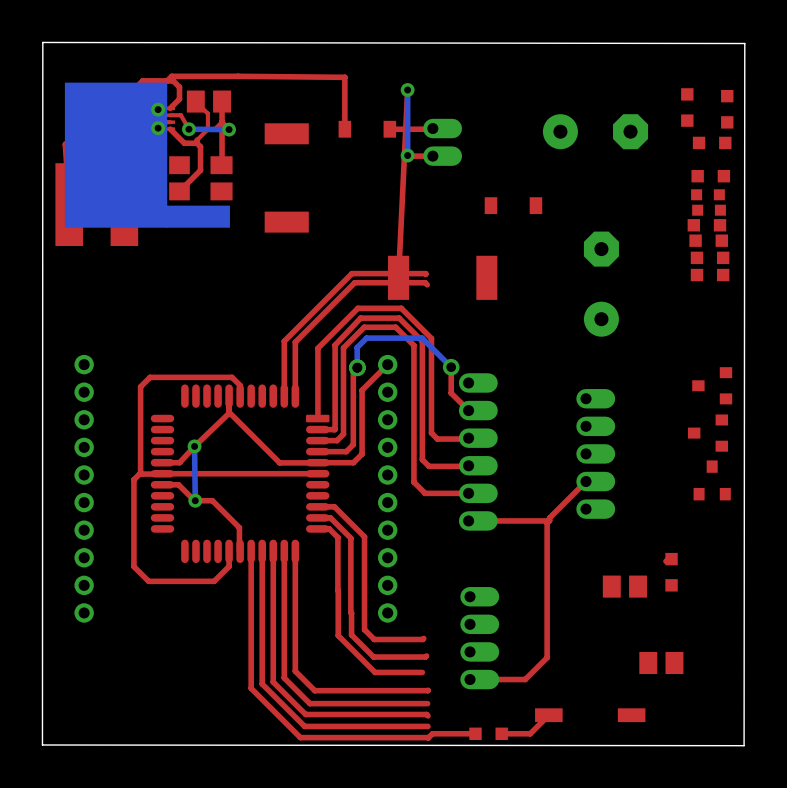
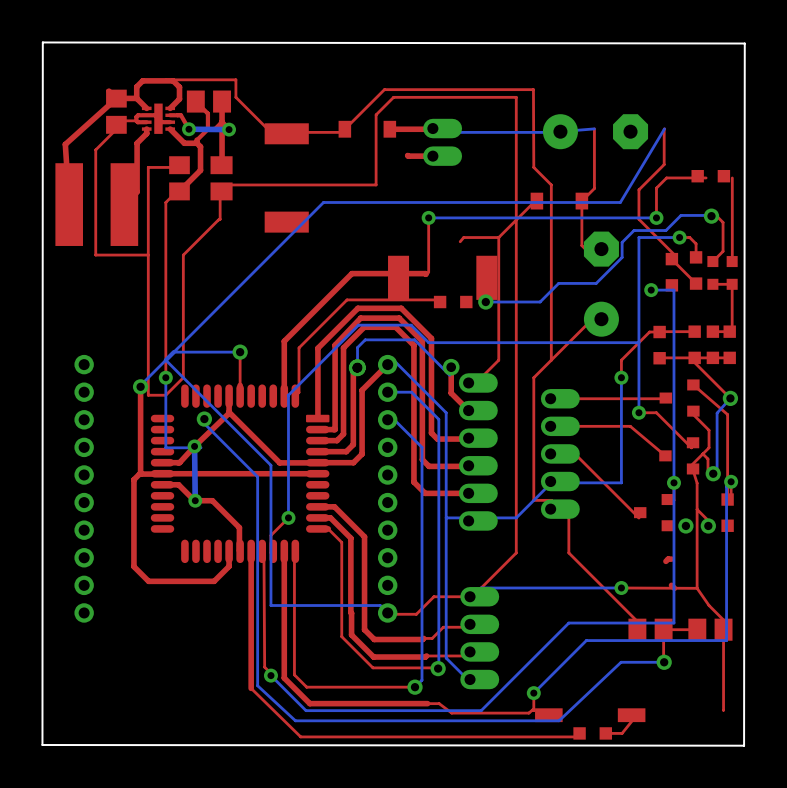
top track: none -> (165, 80) (235, 79) (235, 97) (270, 132) (287, 126) (288, 132) (341, 132) (384, 89) (533, 89) (533, 167) (551, 184) (551, 360)
top track: (167, 80) (171, 76) (344, 77) (344, 133) -> none
drawing: [64, 82, 230, 228] -> none
top track: (407, 89) (398, 277) -> none
bottom track: (407, 89) (407, 155) -> none
via: (407, 89) -> none
part: (687, 107) -> none
via: (158, 109) -> none
part: (727, 109) -> none
top track: none -> (136, 120) (120, 120) (113, 132) (95, 149) (95, 255) (148, 255)
via: (158, 128) -> none
bottom track: none -> (432, 128) (446, 132) (551, 132) (594, 128)
top track: none -> (594, 128) (594, 188) (581, 201) (581, 245) (587, 250)
top track: none -> (664, 128) (664, 164) (638, 189) (638, 219) (673, 254) (671, 259) (696, 283)
bottom track: none -> (664, 128) (620, 202) (323, 202) (140, 386)
part: (712, 142) -> none
via: (407, 155) -> none
top track: none -> (179, 165) (183, 167) (148, 167) (148, 395) (165, 395) (183, 377) (183, 255) (220, 219) (221, 191) (218, 184) (376, 184) (376, 114) (393, 97) (516, 97) (516, 552) (470, 596) (433, 596) (416, 614) (387, 612)
top track: none -> (706, 177) (666, 177) (656, 188) (656, 217)
top track: none -> (732, 177) (732, 261)
top track: none -> (183, 184) (165, 202) (165, 377)
part: (707, 194) -> none
top track: none -> (536, 201) (498, 237)
part position: (513, 205) -> (559, 201)
part: (709, 210) -> none
top track: none -> (711, 216) (716, 216) (723, 222) (723, 251) (712, 261)
bottom track: none -> (711, 216) (681, 215) (665, 230) (634, 230) (622, 242) (622, 257) (596, 283) (558, 283) (540, 302) (485, 302)
via: none -> (711, 216)
top track: none -> (428, 217) (428, 272)
via: none -> (428, 217)
bottom track: none -> (656, 217) (428, 217)
via: none -> (656, 217)
part: (706, 225) -> none
top track: none -> (498, 237) (463, 237) (460, 241)
top track: none -> (498, 237) (498, 360) (481, 377) (468, 382)
top track: none -> (679, 237) (689, 237) (696, 243) (696, 257) (691, 255)
bottom track: none -> (679, 237) (638, 237) (638, 412)
via: none -> (679, 237)
part: (708, 240) -> none
part: (710, 257) -> none
part footprint: [690, 268, 730, 282] -> [707, 256, 719, 290]
part: none -> (696, 270)
part: none -> (671, 272)
part: none -> (732, 272)
top track: (427, 284) (425, 282) (354, 282) (295, 342) (295, 396) -> (440, 302) (437, 299) (347, 299) (299, 347) (299, 392) (295, 396)
top track: none -> (712, 284) (732, 284) (732, 329) (729, 331) (712, 331)
bottom track: none -> (651, 290) (673, 290) (673, 623) (568, 623) (481, 710) (306, 710) (270, 675)
via: none -> (651, 290)
part: none -> (453, 302)
via: none -> (485, 302)
top track: none -> (587, 320) (586, 325) (533, 377) (533, 500) (551, 500)
top track: none -> (694, 331) (649, 332) (621, 360) (621, 377)
bottom track: none -> (638, 342) (428, 342) (411, 325) (358, 325) (288, 395) (288, 517)
part: none -> (694, 344)
part: none -> (712, 344)
part: none -> (729, 344)
part: none -> (659, 345)
bottom track: none -> (240, 352) (173, 352) (165, 360) (270, 465) (270, 605) (380, 605) (387, 612)
via: none -> (240, 352)
top track: none -> (694, 357) (694, 362) (730, 398)
top track: none -> (729, 357) (659, 358)
bottom track: none -> (387, 364) (393, 360) (446, 412) (446, 658) (470, 679)
bottom track: (451, 367) (422, 338) (366, 338) (357, 347) (357, 367) -> none
bottom track: none -> (357, 369) (357, 347) (365, 339) (414, 339) (449, 375)
bottom track: none -> (165, 377) (165, 447) (200, 447) (194, 446) (194, 500) (194, 501)
via: none -> (165, 377)
bottom track: none -> (621, 377) (621, 482) (551, 482)
via: none -> (621, 377)
top track: none -> (693, 384) (727, 414) (727, 499) (731, 500) (731, 481)
top track: (240, 385) (232, 377) (150, 377) (140, 386) -> (240, 385) (240, 352)
part: (712, 385) -> none
via: none -> (140, 386)
bottom track: none -> (387, 392) (411, 392) (438, 419) (438, 668)
top track: none -> (665, 398) (550, 398)
part: none -> (679, 398)
bottom track: none -> (730, 398) (717, 413) (717, 469) (713, 473)
via: none -> (730, 398)
top track: none -> (693, 411) (691, 412) (709, 430) (709, 447) (691, 465)
top track: none -> (638, 412) (656, 412) (691, 447) (693, 442)
via: none -> (638, 412)
bottom track: none -> (204, 419) (202, 419) (202, 422) (257, 476) (257, 685) (295, 720) (559, 720) (621, 662) (664, 662)
via: none -> (204, 419)
bottom track: none -> (387, 419) (394, 419) (422, 447) (422, 680) (415, 687)
top track: none -> (550, 426) (630, 426) (665, 455)
part: (707, 433) -> none
top track: none -> (550, 453) (551, 447) (568, 447) (638, 517) (640, 512)
part position: (595, 453) -> (560, 453)
top track: none -> (702, 453) (707, 459) (707, 473) (713, 473)
part: none -> (679, 455)
top track: none -> (691, 465) (697, 483) (697, 588)
via: none -> (713, 473)
part: (712, 480) -> none
top track: (586, 481) (549, 517) (547, 523) (547, 657) (525, 679) (470, 679) -> none
bottom track: none -> (731, 481) (726, 486) (726, 640) (586, 640) (533, 693)
via: none -> (731, 481)
bottom track: none -> (551, 482) (516, 517) (481, 517) (468, 520) (463, 517) (446, 517)
via: none -> (673, 482)
top track: none -> (551, 500) (568, 517) (568, 552) (638, 623) (637, 629)
top track: none -> (697, 509) (708, 520) (708, 525)
part: none -> (654, 512)
via: none -> (288, 517)
top track: (549, 520) (468, 520) -> none
via: none -> (685, 525)
via: none -> (708, 525)
top track: (328, 528) (337, 537) (338, 635) (375, 672) (422, 672) -> (328, 528) (341, 542) (341, 636) (372, 667) (438, 668)
top track: (262, 551) (262, 684) (304, 726) (427, 726) -> (262, 551) (263, 554) (264, 667) (270, 675)
top track: (273, 551) (273, 682) (305, 714) (427, 715) -> (273, 551) (270, 552) (270, 535) (288, 517)
top track: (295, 551) (295, 671) (314, 690) (428, 690) -> (295, 551) (294, 674) (306, 687) (415, 687)
part position: (671, 572) -> (727, 512)
part: (624, 586) -> none
top track: none -> (621, 587) (697, 588)
bottom track: none -> (621, 587) (481, 587) (470, 596)
via: none -> (621, 587)
top track: none -> (697, 588) (709, 605) (726, 623) (723, 629) (723, 710)
top track: none -> (470, 624) (467, 627) (443, 627) (432, 638) (423, 638)
part: none -> (650, 629)
top track: none -> (697, 629) (663, 629) (664, 662)
part: none -> (710, 629)
top track: none -> (470, 651) (465, 655) (426, 655)
part: (661, 662) -> none
via: none -> (664, 662)
via: none -> (438, 668)
via: none -> (270, 675)
via: none -> (415, 687)
top track: (251, 688) (300, 737) (428, 737) (432, 733) (475, 733) -> (251, 688) (300, 736) (575, 736) (579, 733)
top track: none -> (533, 693) (533, 710) (528, 713) (451, 713) (439, 703) (427, 703)
via: none -> (533, 693)
top track: none -> (640, 710) (622, 733) (605, 733)
top track: (548, 715) (530, 733) (501, 733) -> none
part: (488, 733) -> none
part: none -> (592, 733)

